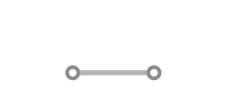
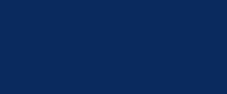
via: (72, 72) -> none
track: (153, 72) (72, 72) -> none
via: (153, 72) -> none

